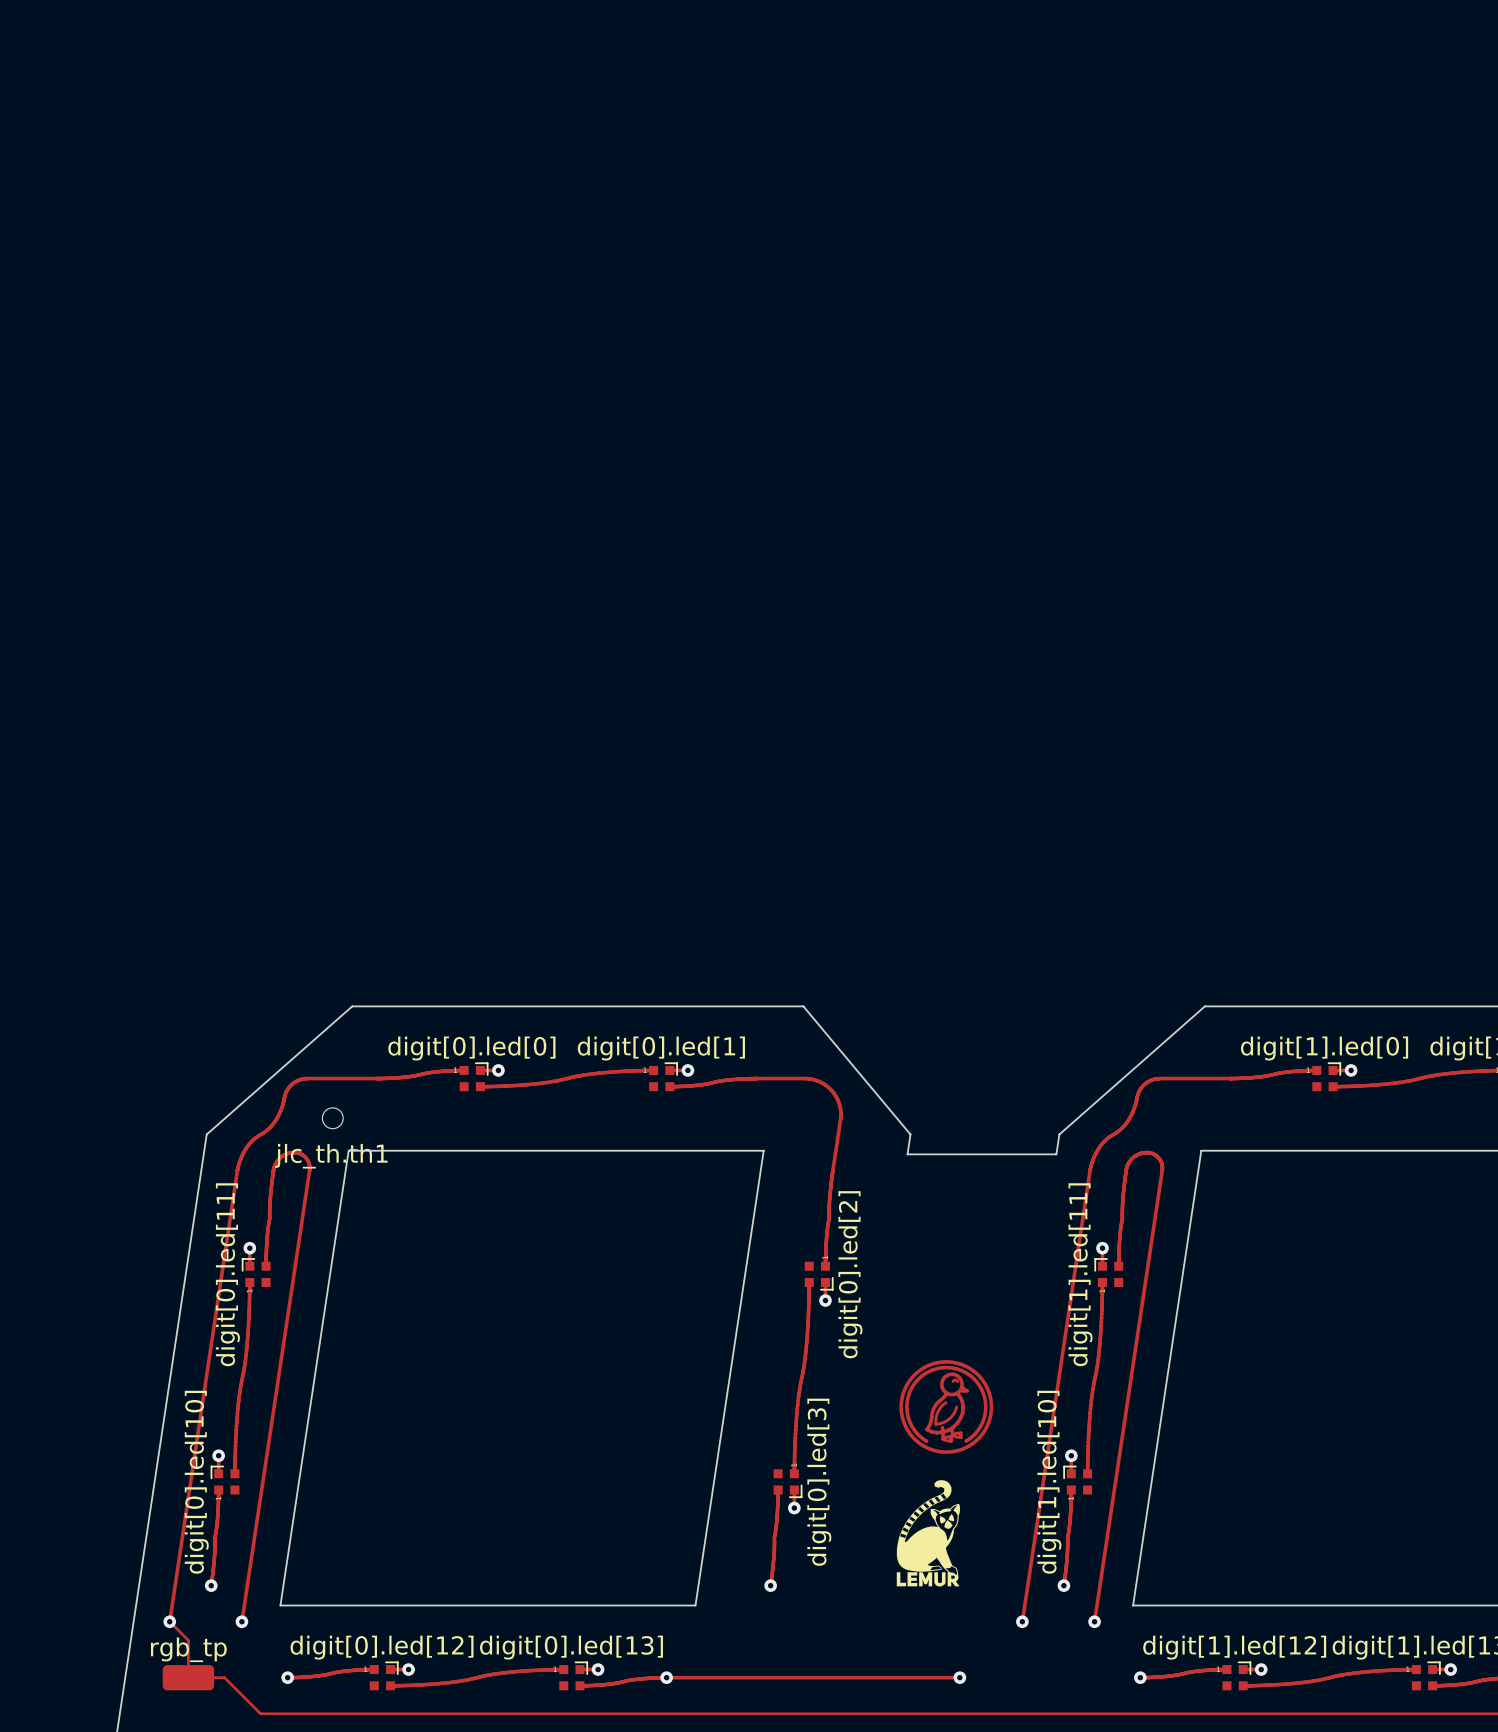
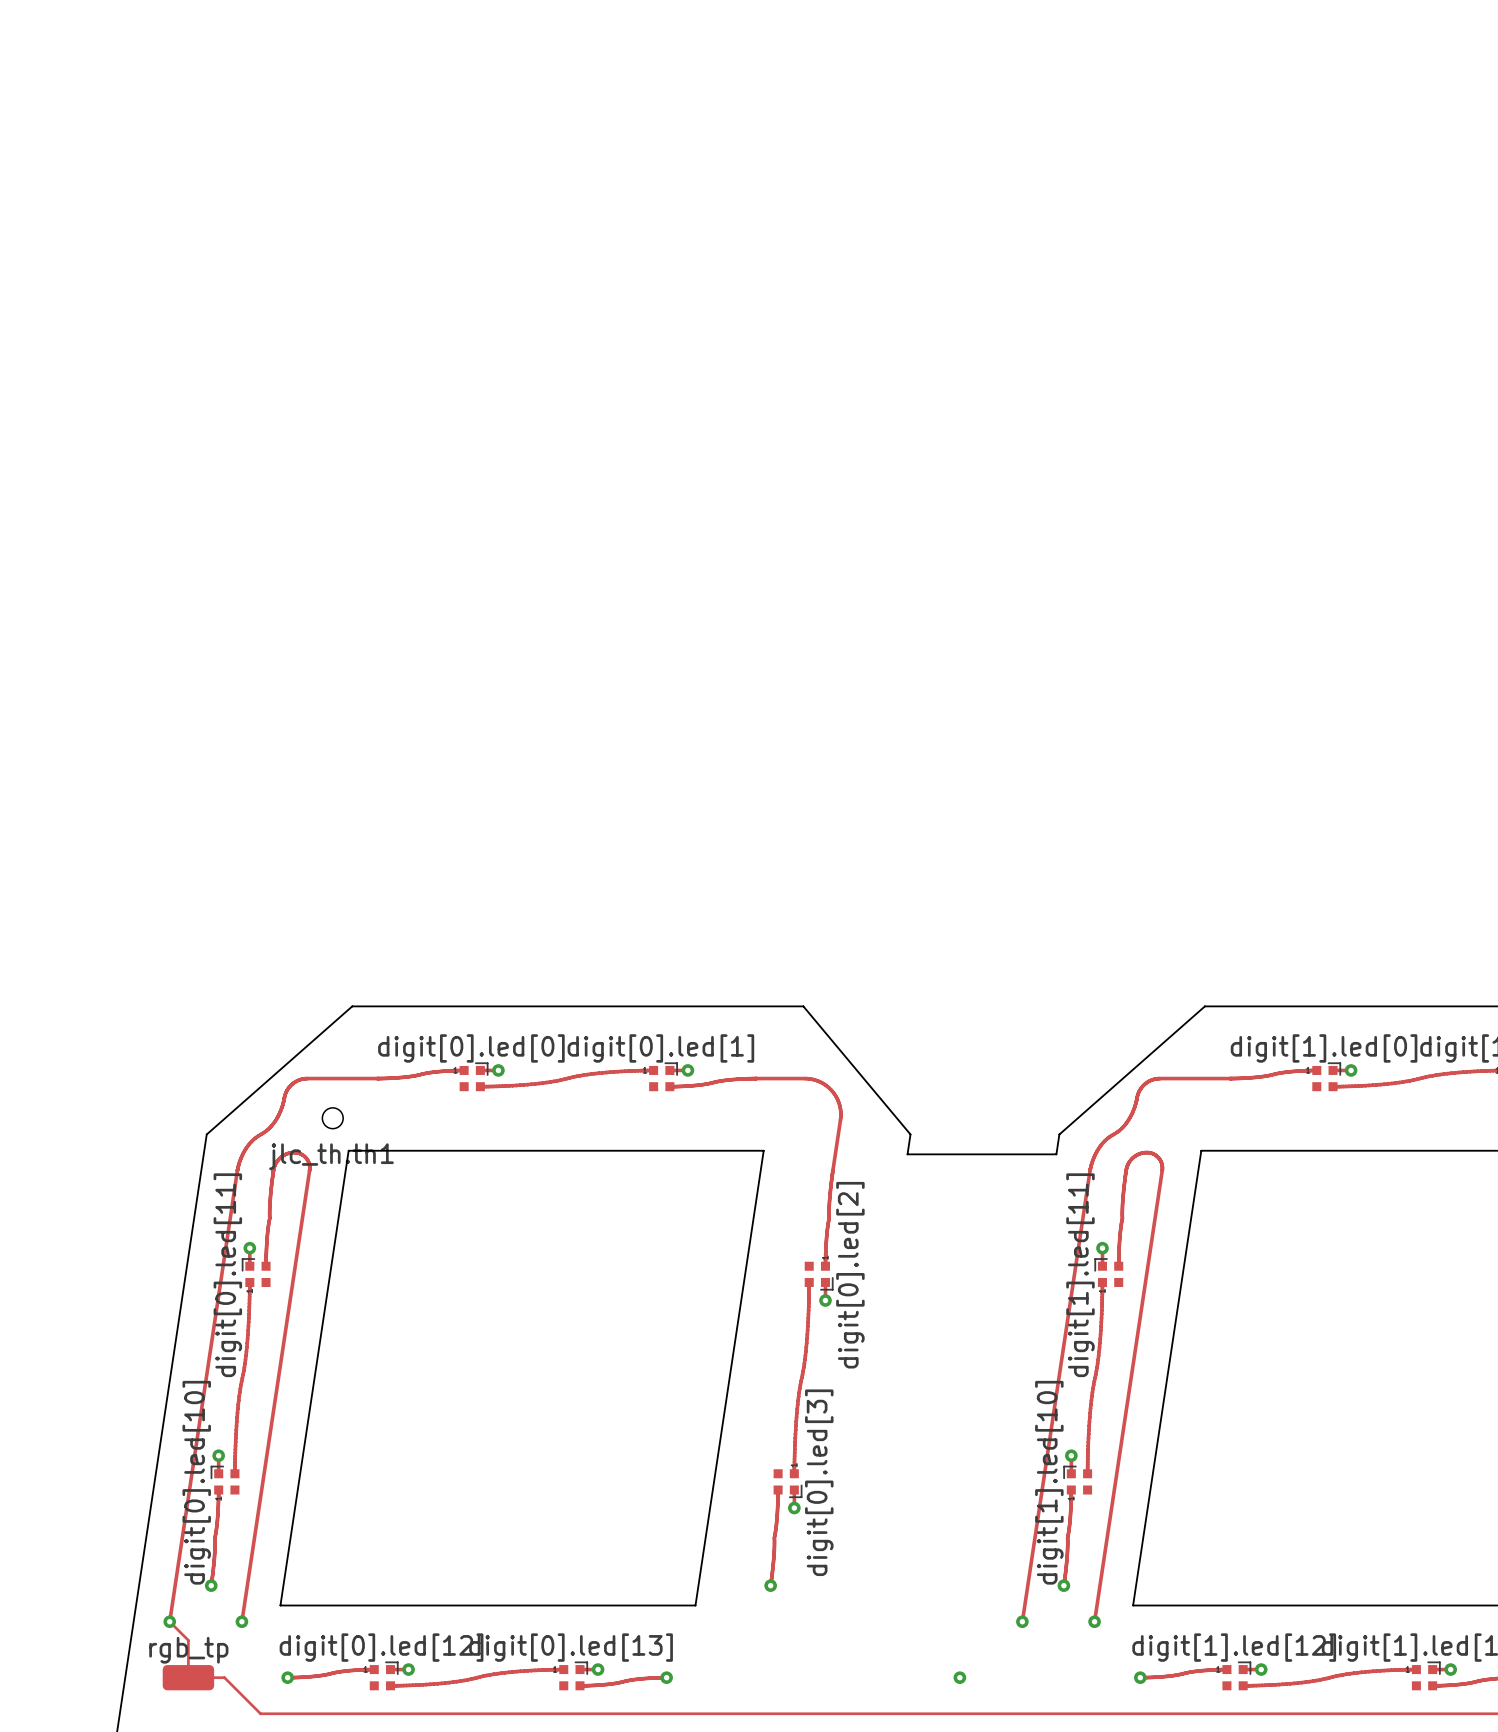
drawing: [899, 1360, 994, 1454] -> none
drawing: [896, 1480, 961, 1587] -> none
track: (666, 1677) (959, 1677) -> none

